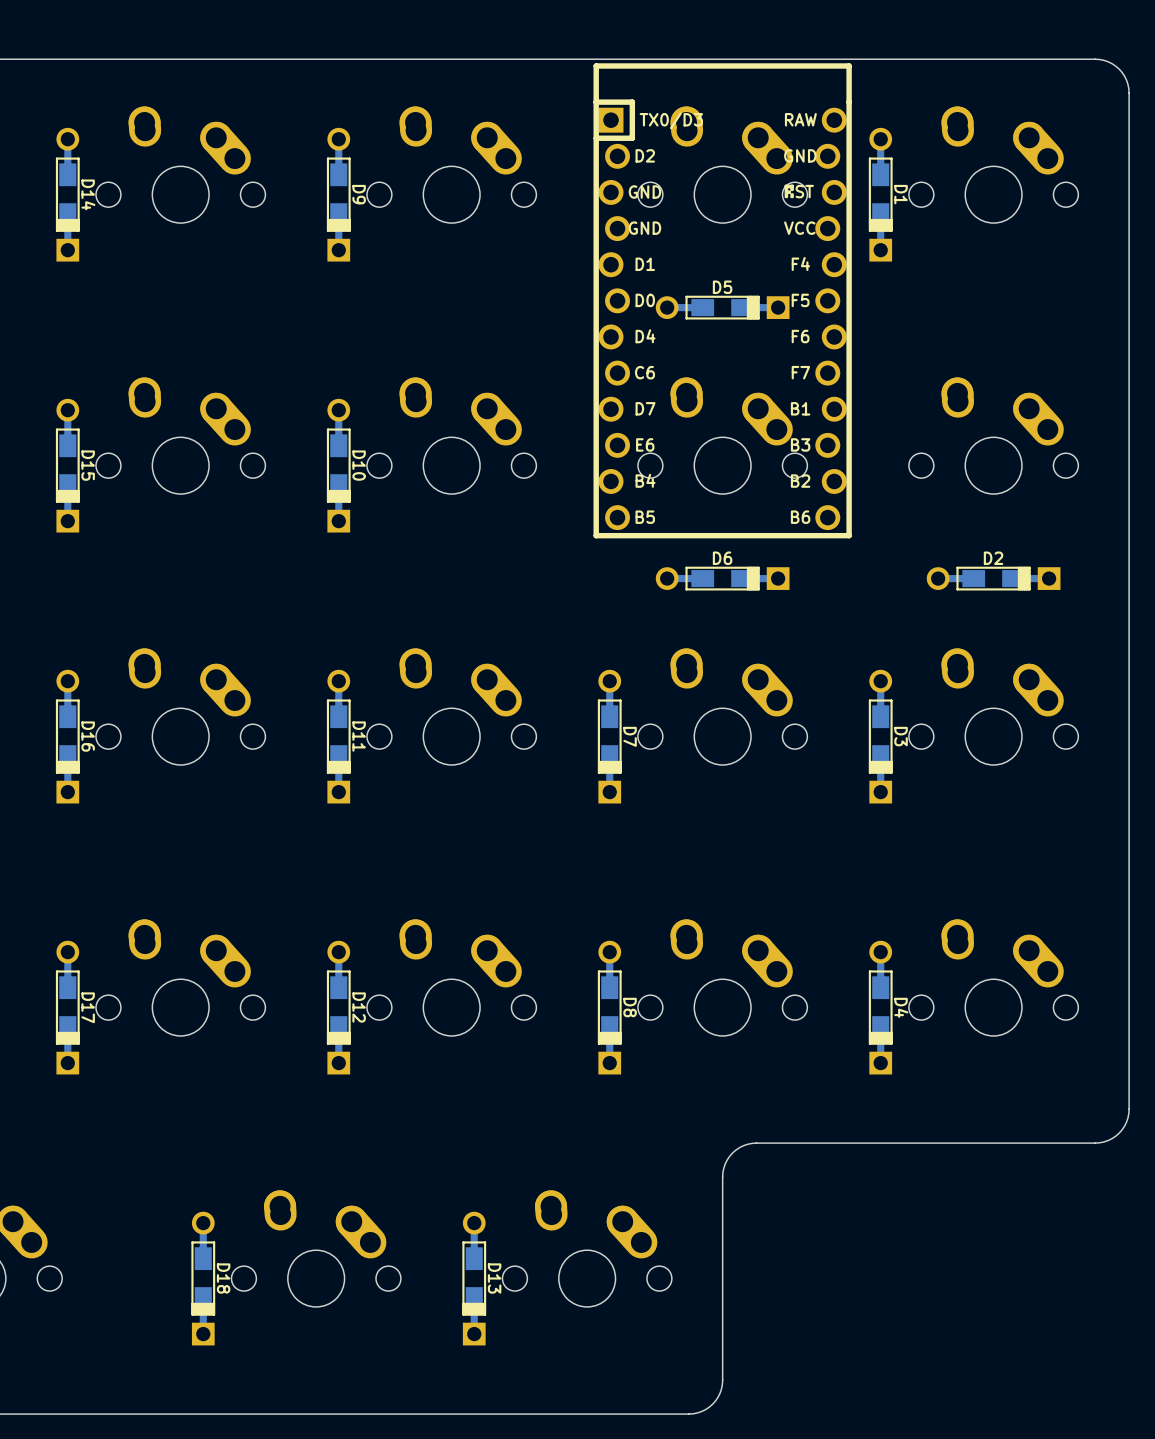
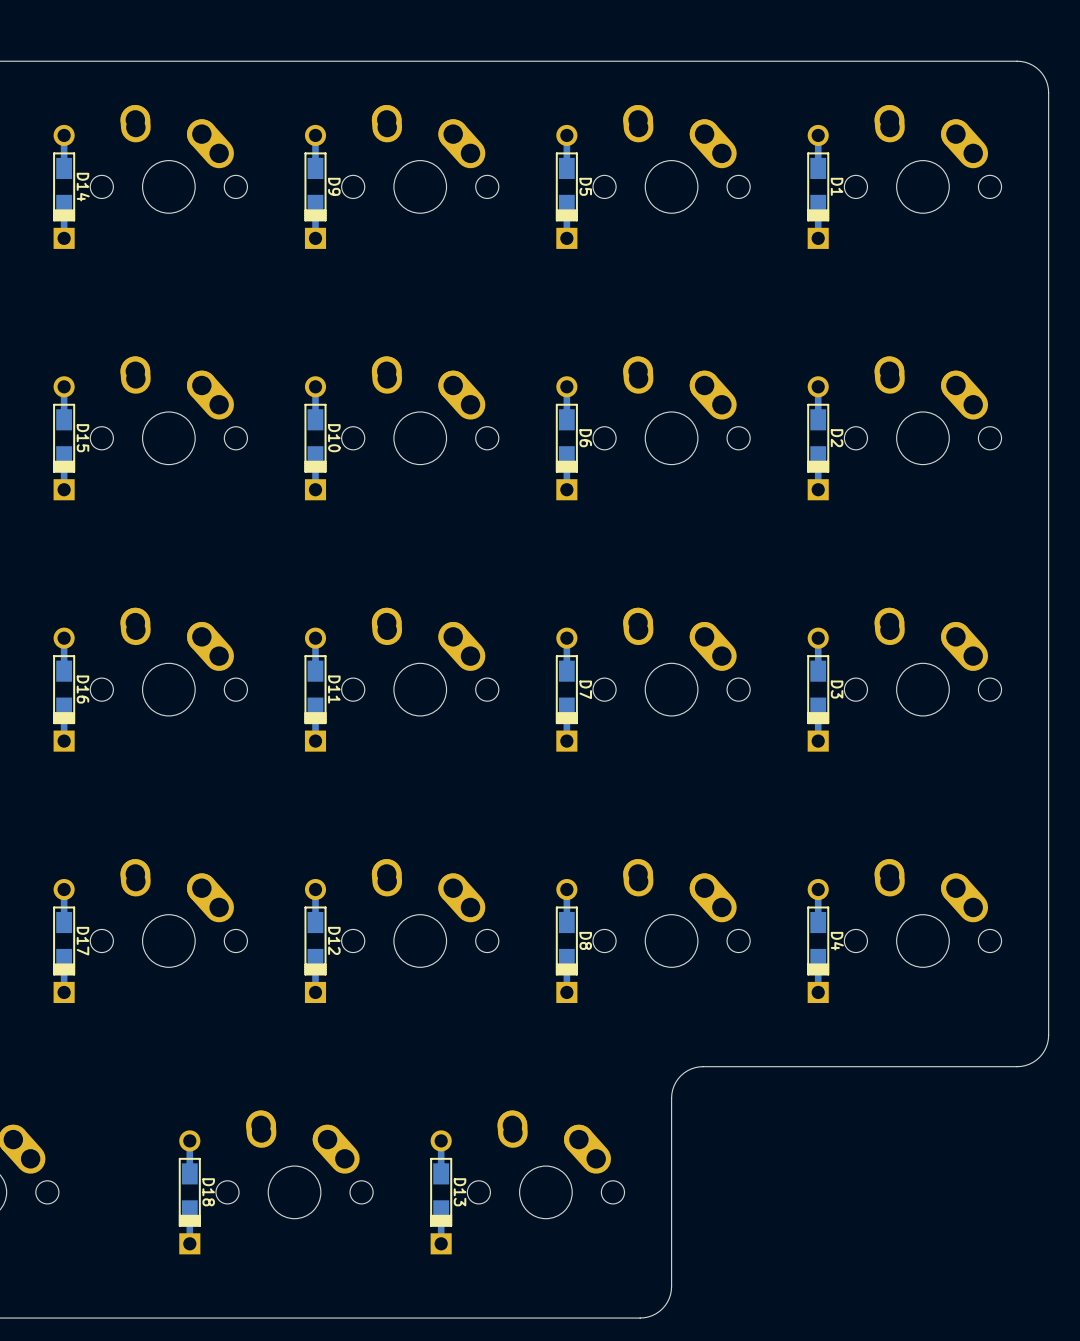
part: (722, 300) -> none
D5 rotation: 0° (722, 307) -> 90° clockwise (566, 186)
D5 position: (722, 307) -> (566, 186)
D6 rotation: 0° (722, 578) -> 90° clockwise (566, 438)
D6 position: (722, 578) -> (566, 438)
D2 rotation: 0° (993, 578) -> 90° clockwise (818, 438)
D2 position: (993, 578) -> (818, 438)

